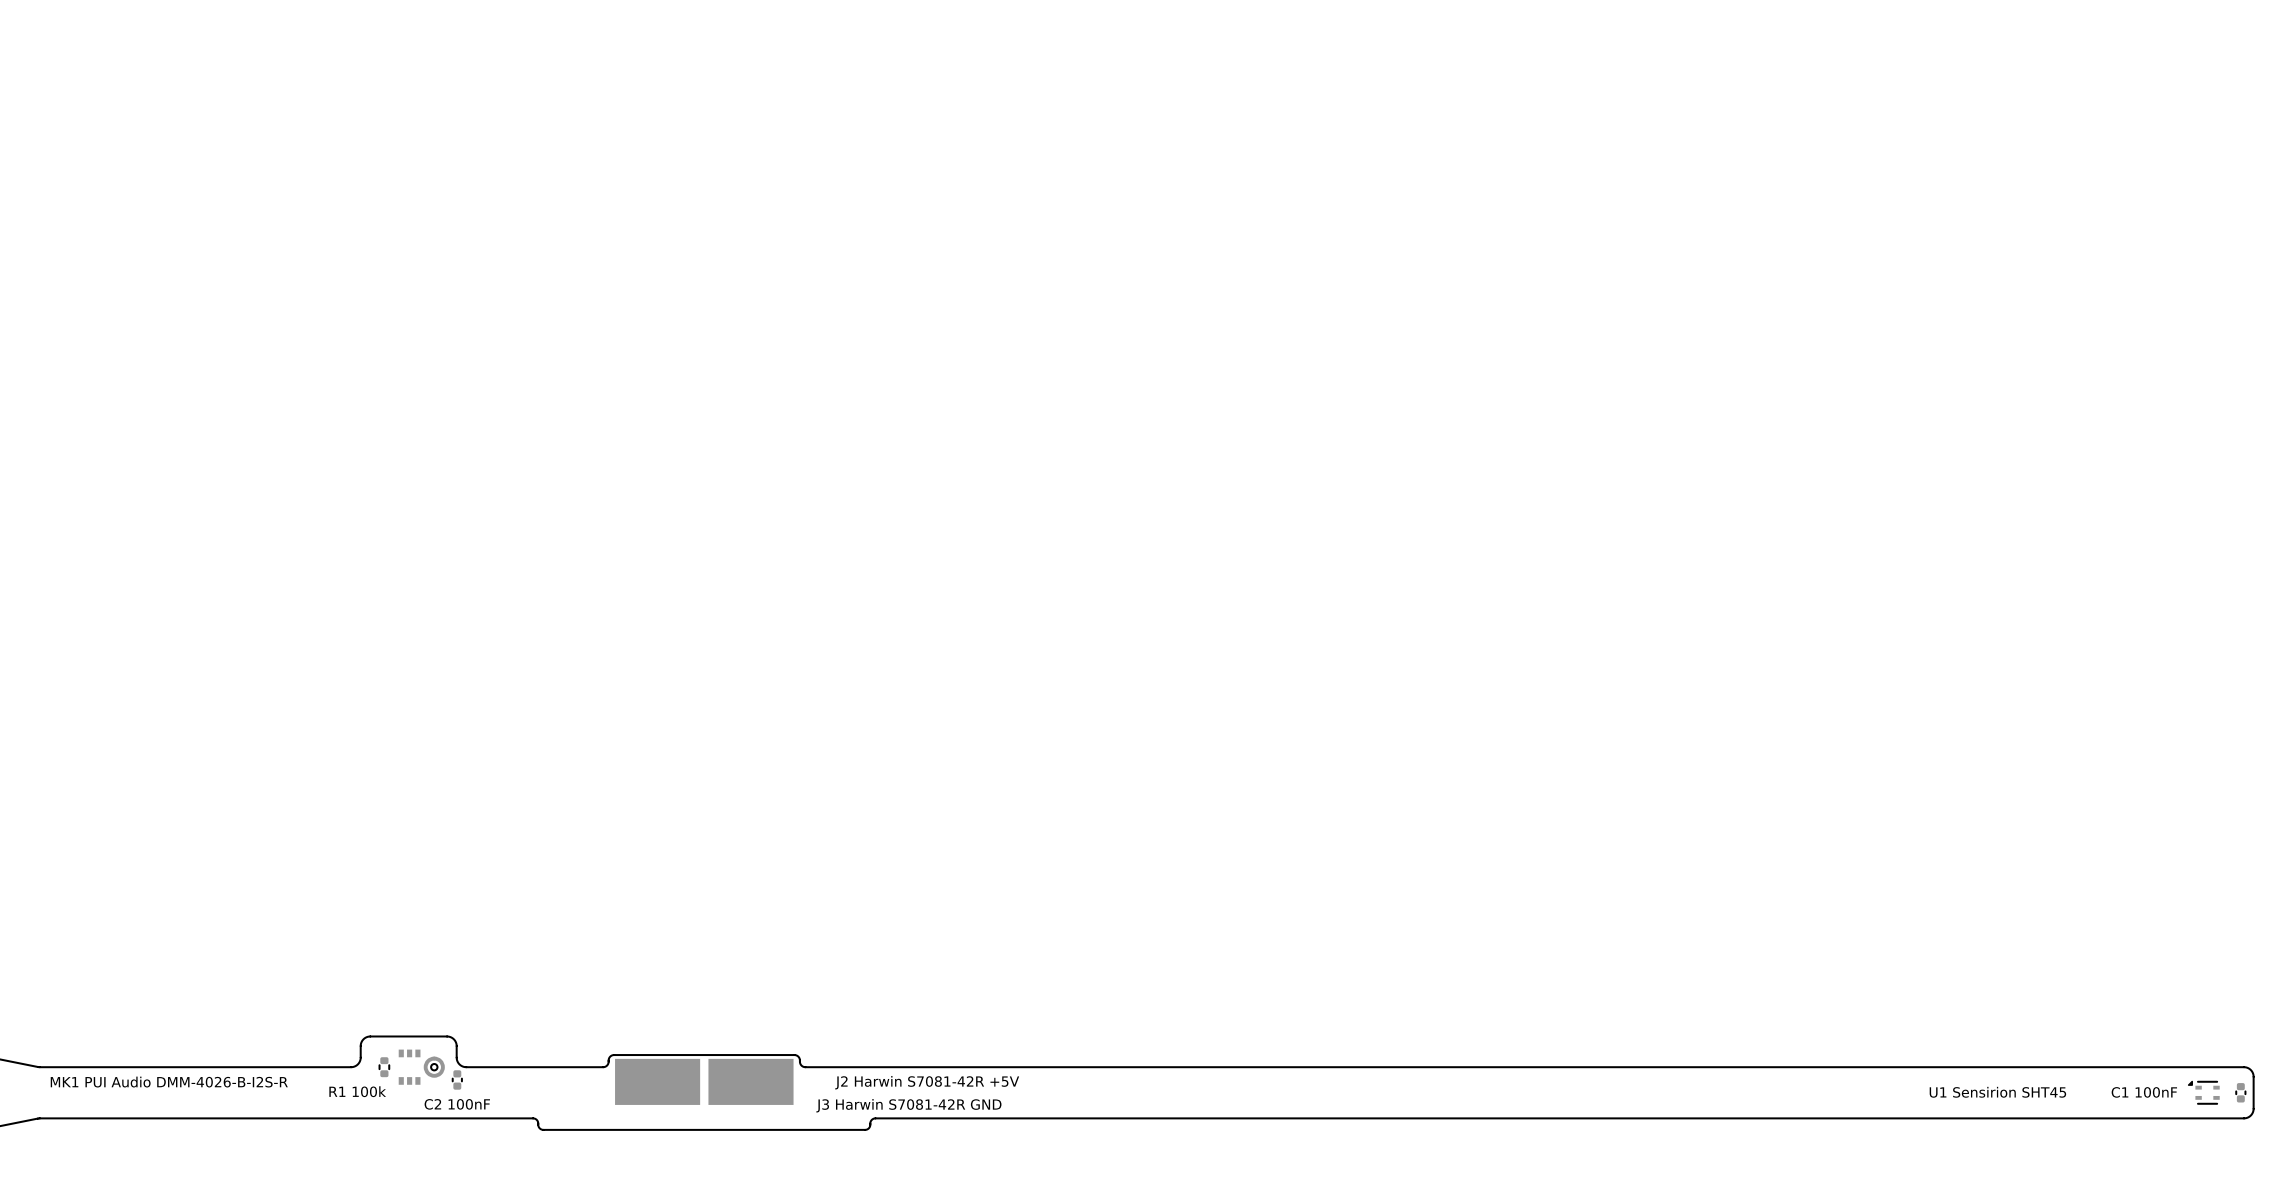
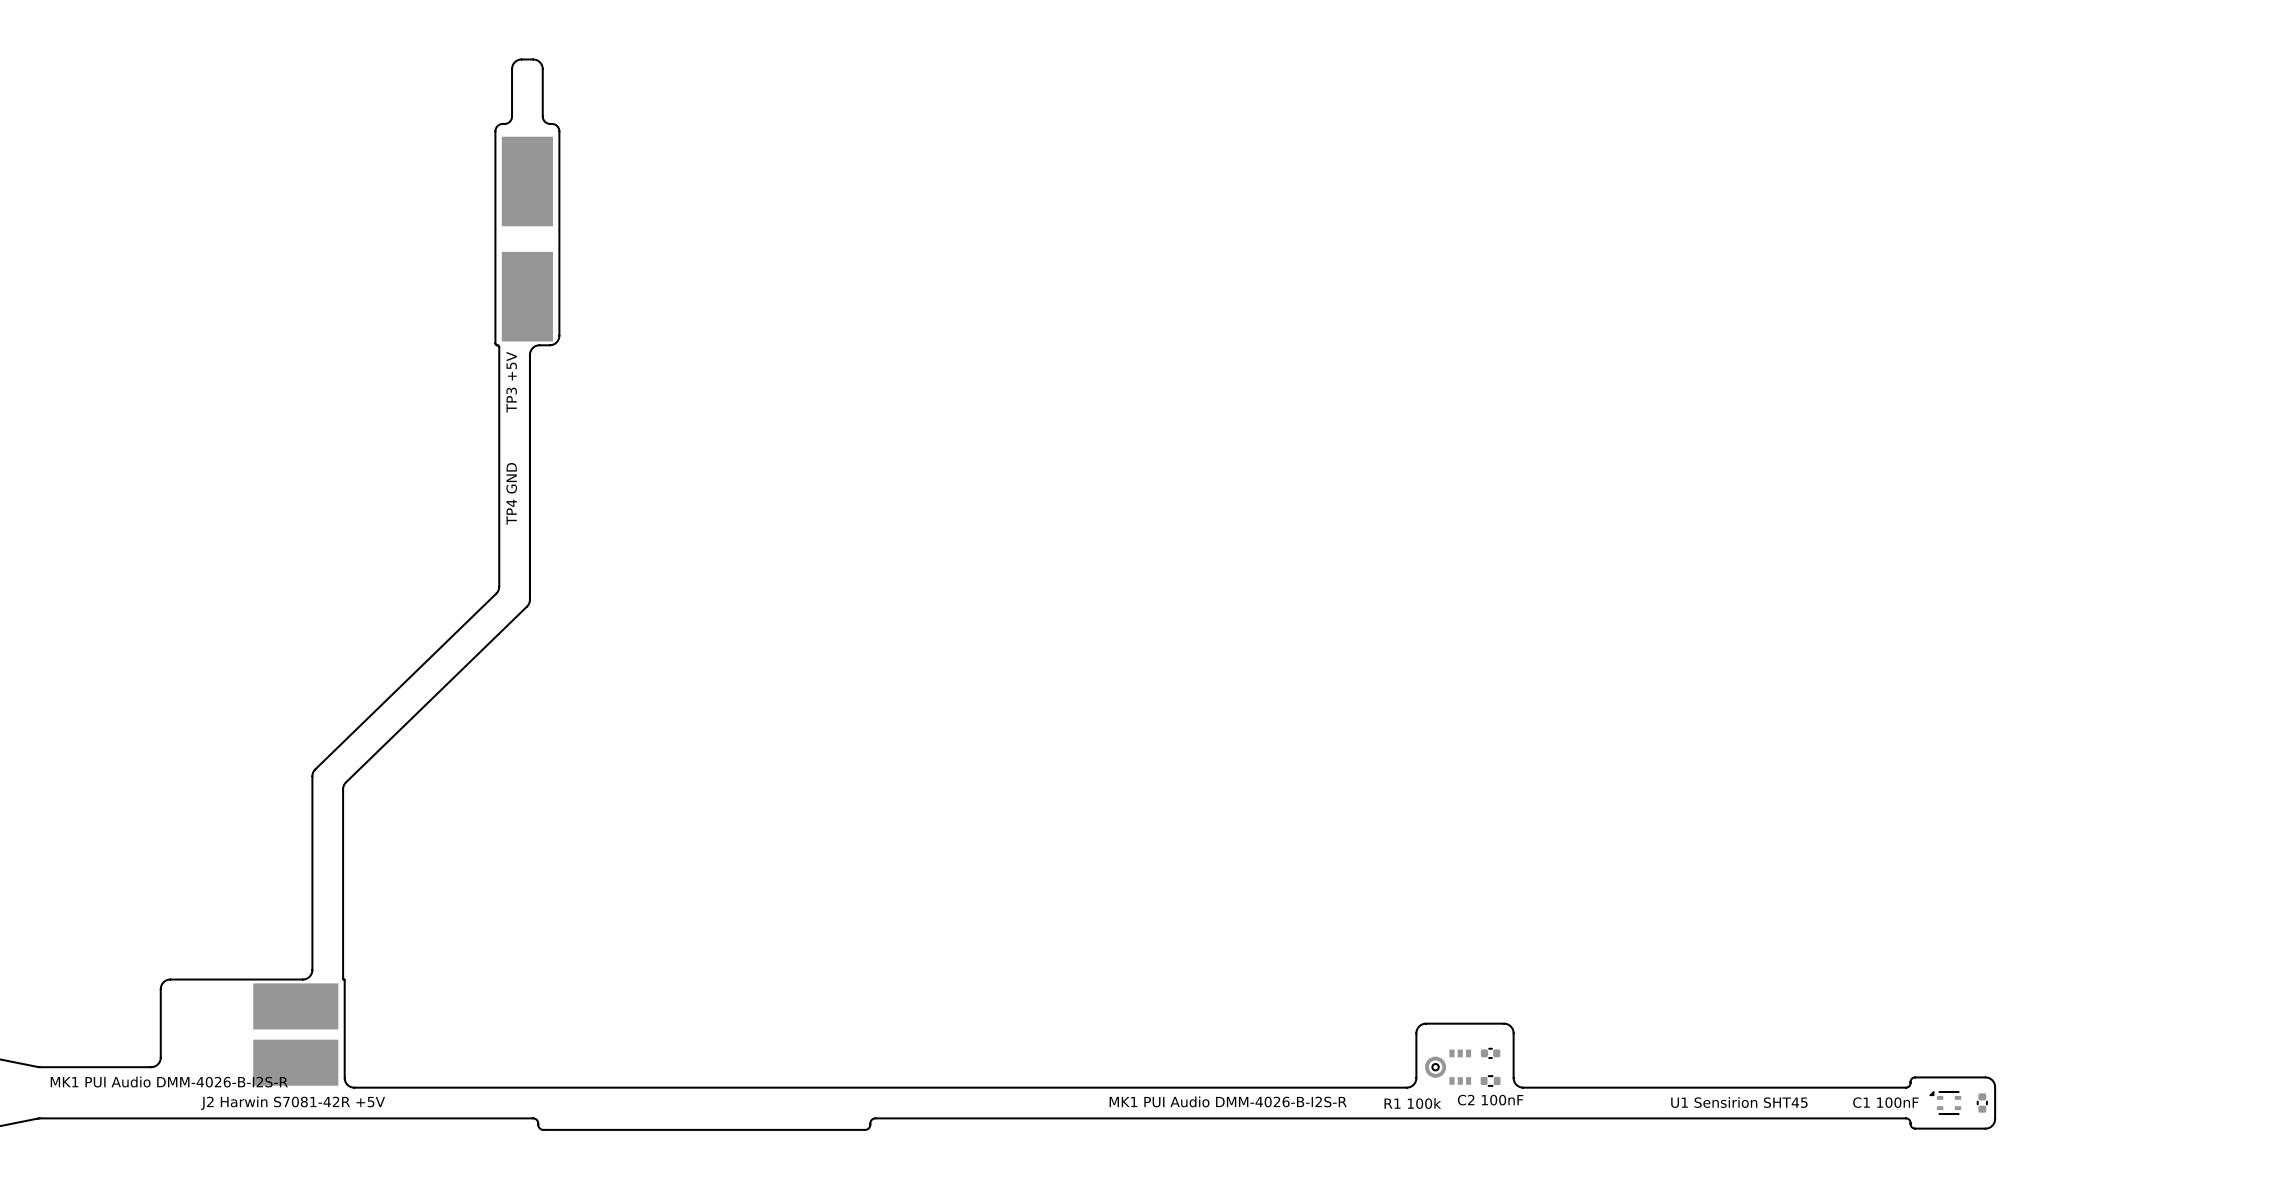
part: none -> (527, 181)
part: none -> (527, 296)
text: none -> TP3 +5V (511, 382)
text: none -> TP4 GND (511, 493)
board edge: none -> (343, 979) (344, 784) (527, 606) (529, 601) (530, 353) (536, 345) (554, 344) (559, 335) (559, 130) (555, 125) (547, 123) (543, 119) (542, 68) (539, 62) (535, 59) (519, 59) (513, 63) (511, 118) (507, 123) (498, 125) (495, 130) (495, 343) (499, 347) (498, 590) (313, 771) (312, 969) (310, 975) (302, 979) (165, 980) (160, 989) (160, 1058) (157, 1064) (151, 1067)
part: none -> (295, 1006)
part: none -> (1490, 1053)
part: none -> (295, 1062)
board edge: (151, 1067) (352, 1067) (359, 1062) (361, 1043) (367, 1036) (447, 1036) (455, 1041) (457, 1061) (460, 1065) (466, 1067) (603, 1067) (607, 1064) (609, 1057) (614, 1055) (794, 1055) (798, 1056) (801, 1065) (805, 1067) (2244, 1067) (2250, 1069) (2253, 1075) (2253, 1110) (2250, 1115) (2245, 1118) (1905, 1118) -> (343, 979) (344, 1079) (347, 1084) (353, 1087) (1406, 1087) (1412, 1085) (1416, 1080) (1416, 1032) (1419, 1026) (1425, 1023) (1508, 1024) (1513, 1032) (1513, 1080) (1516, 1084) (1521, 1087) (1905, 1087) (1909, 1086) (1911, 1079) (1915, 1077) (1986, 1077) (1994, 1083) (1995, 1120) (1988, 1128) (1914, 1128) (1911, 1126) (1909, 1120) (1905, 1118)
part: (384, 1067) -> none
part: (421, 1067) -> none
part: none -> (1448, 1067)
part: (457, 1079) -> none
part: (657, 1081) -> none
part: (751, 1081) -> none
part: none -> (1490, 1081)
text: J2 Harwin S7081-42R +5V (927, 1082) -> none
text: R1 100k (357, 1091) -> none
text position: U1 Sensirion SHT45 (1997, 1092) -> U1 Sensirion SHT45 (1739, 1102)
text position: C1 100nF (2144, 1092) -> C1 100nF (1885, 1102)
part position: (2203, 1092) -> (1945, 1102)
part position: (2240, 1092) -> (1982, 1103)
text: none -> C2 100nF (1490, 1100)
text: none -> MK1 PUI Audio DMM-4026-B-I2S-R (1228, 1101)
text: none -> J2 Harwin S7081-42R +5V (293, 1103)
text: none -> R1 100k (1412, 1103)
text: C2 100nF (457, 1104) -> none
text: J3 Harwin S7081-42R GND (908, 1105) -> none

